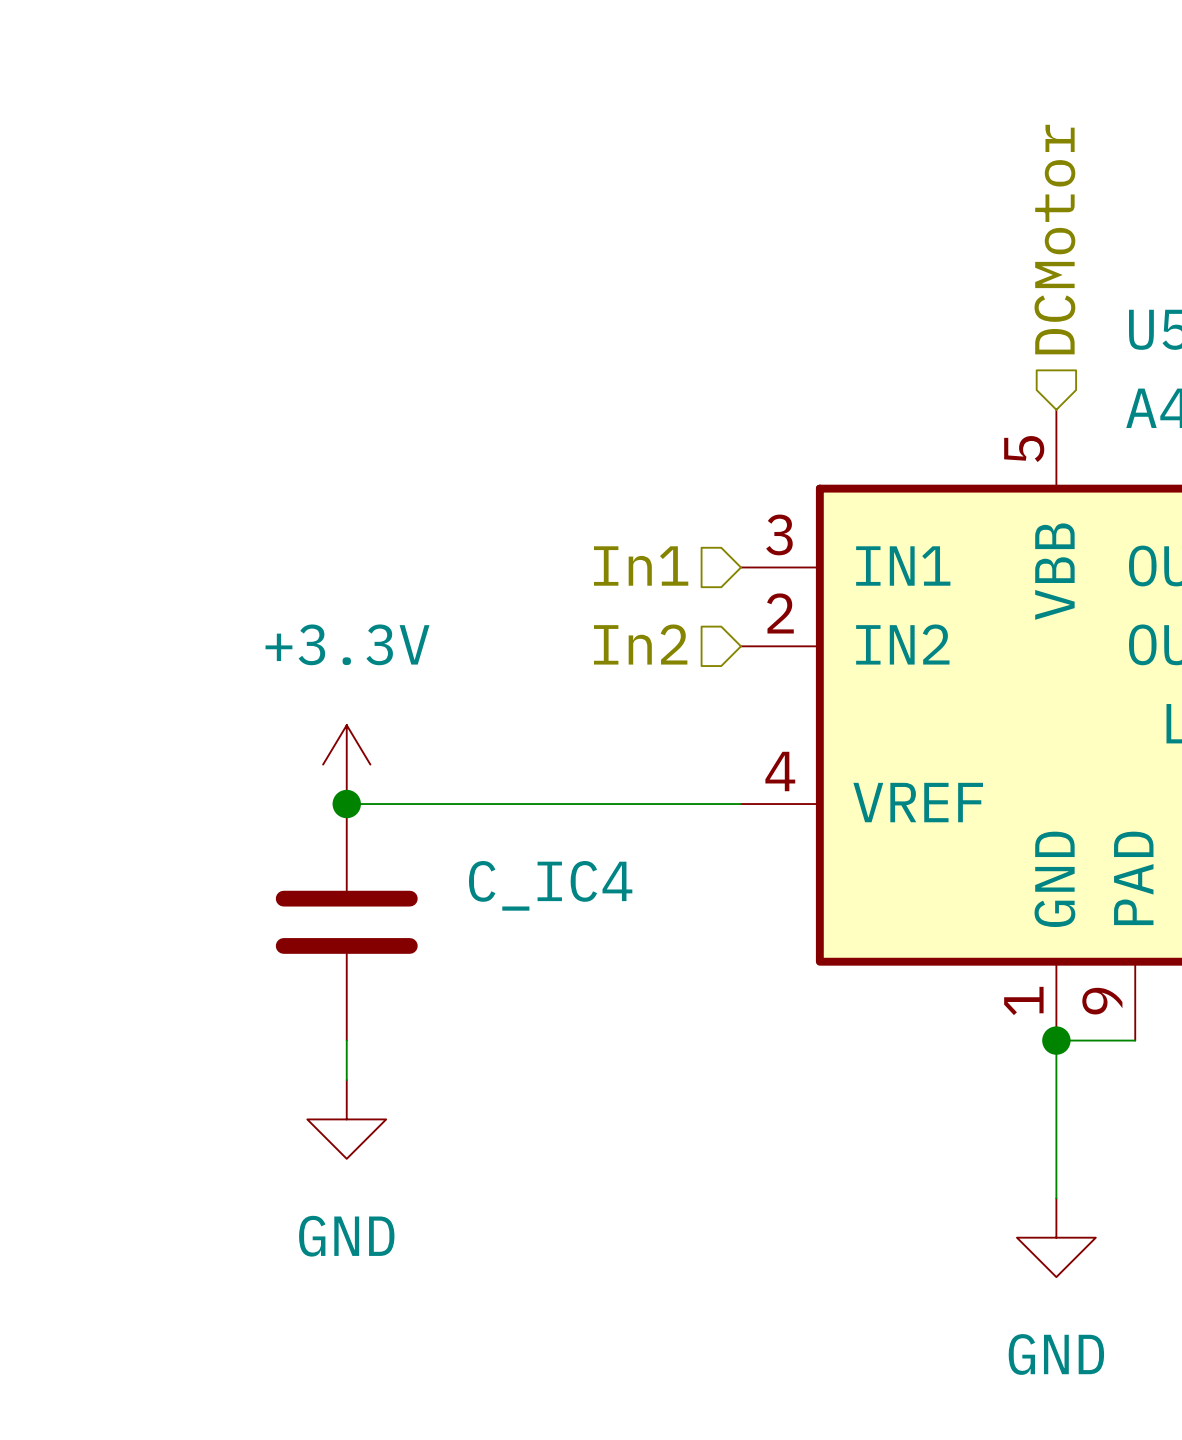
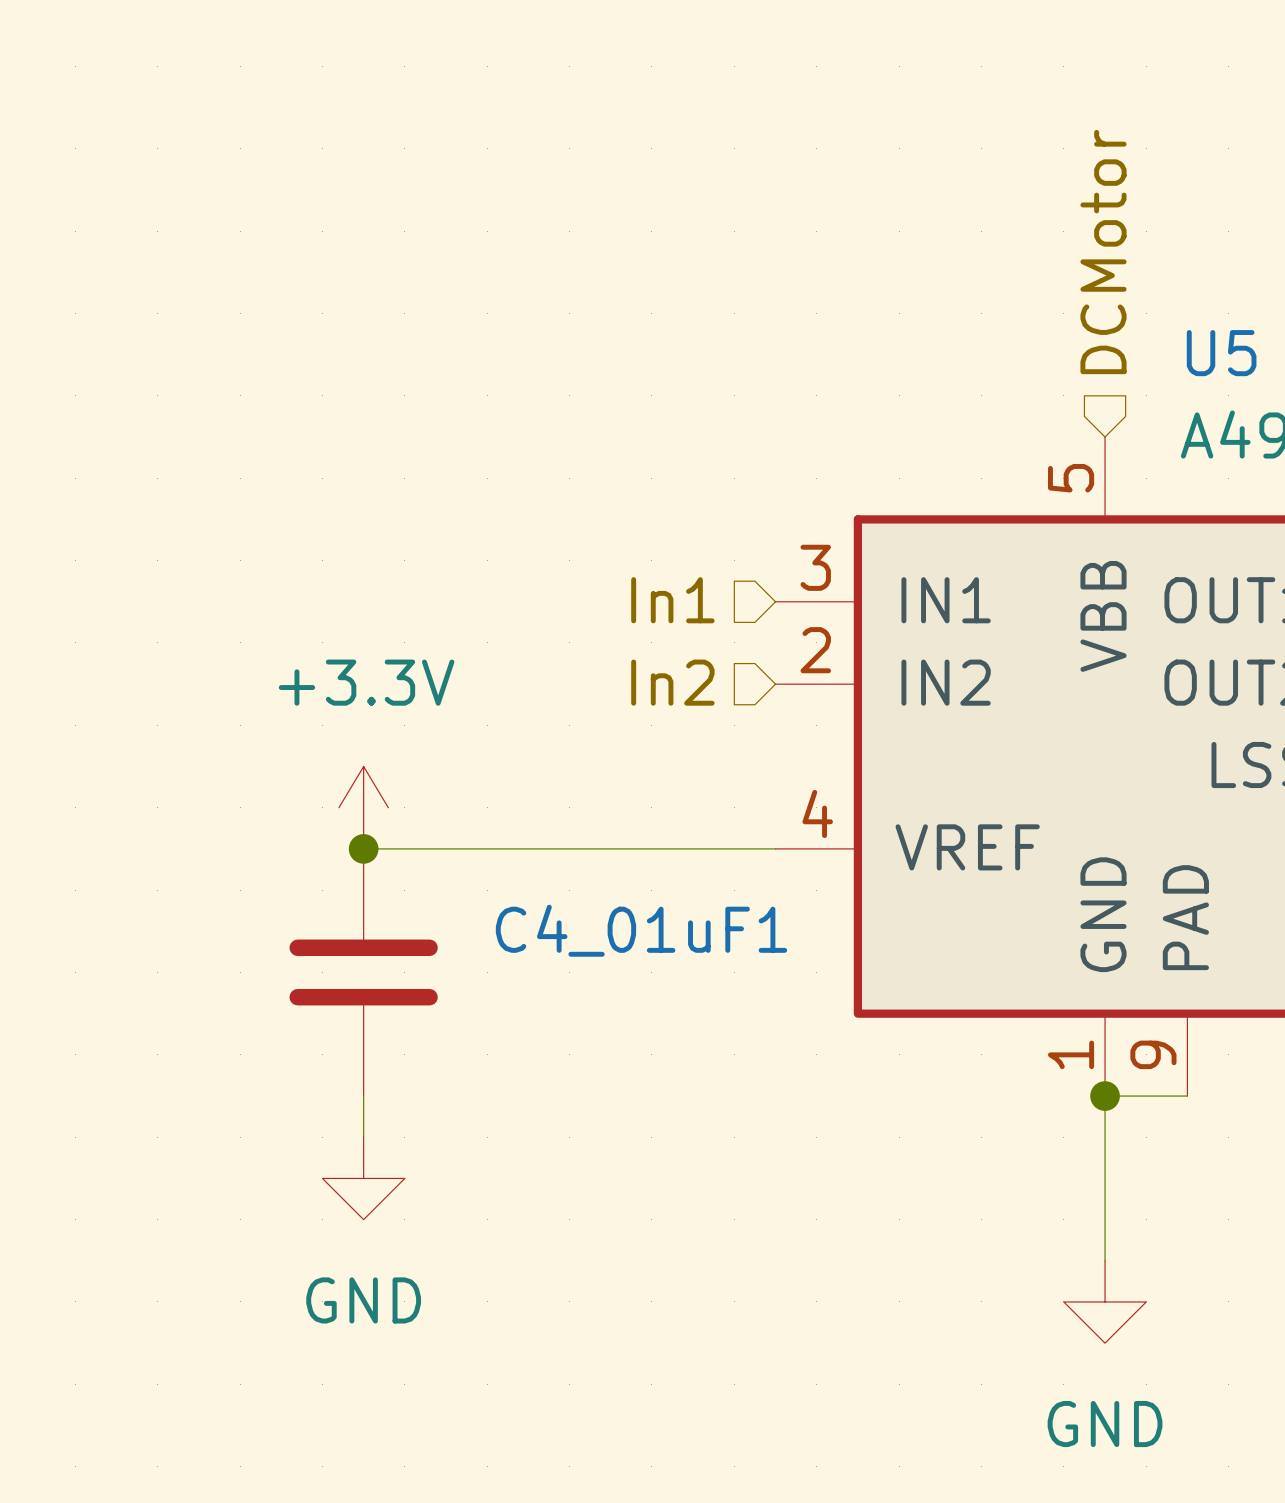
C_IC4 name: C_IC4 (550, 885) -> C4_01uF1 (641, 930)

